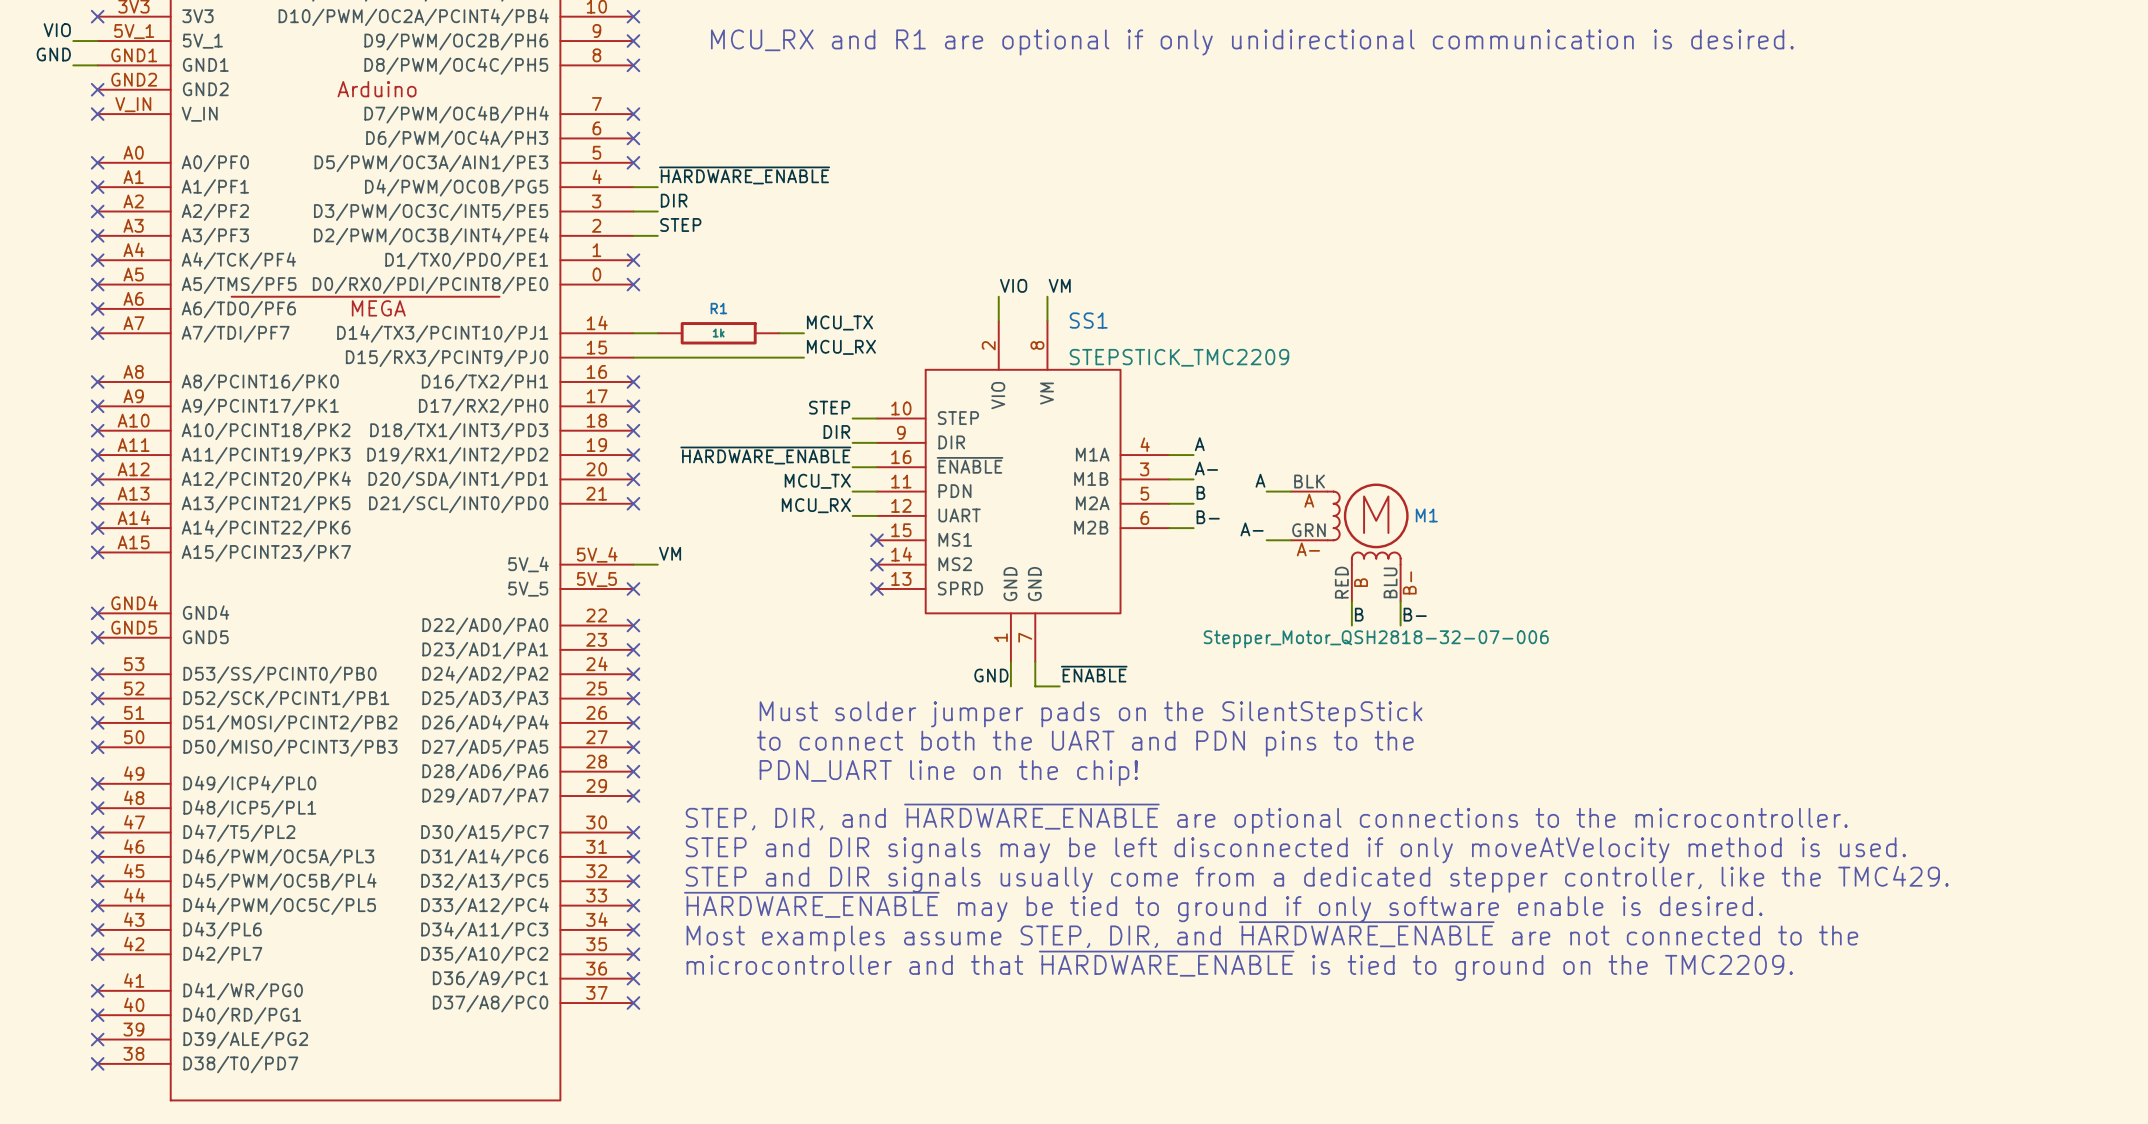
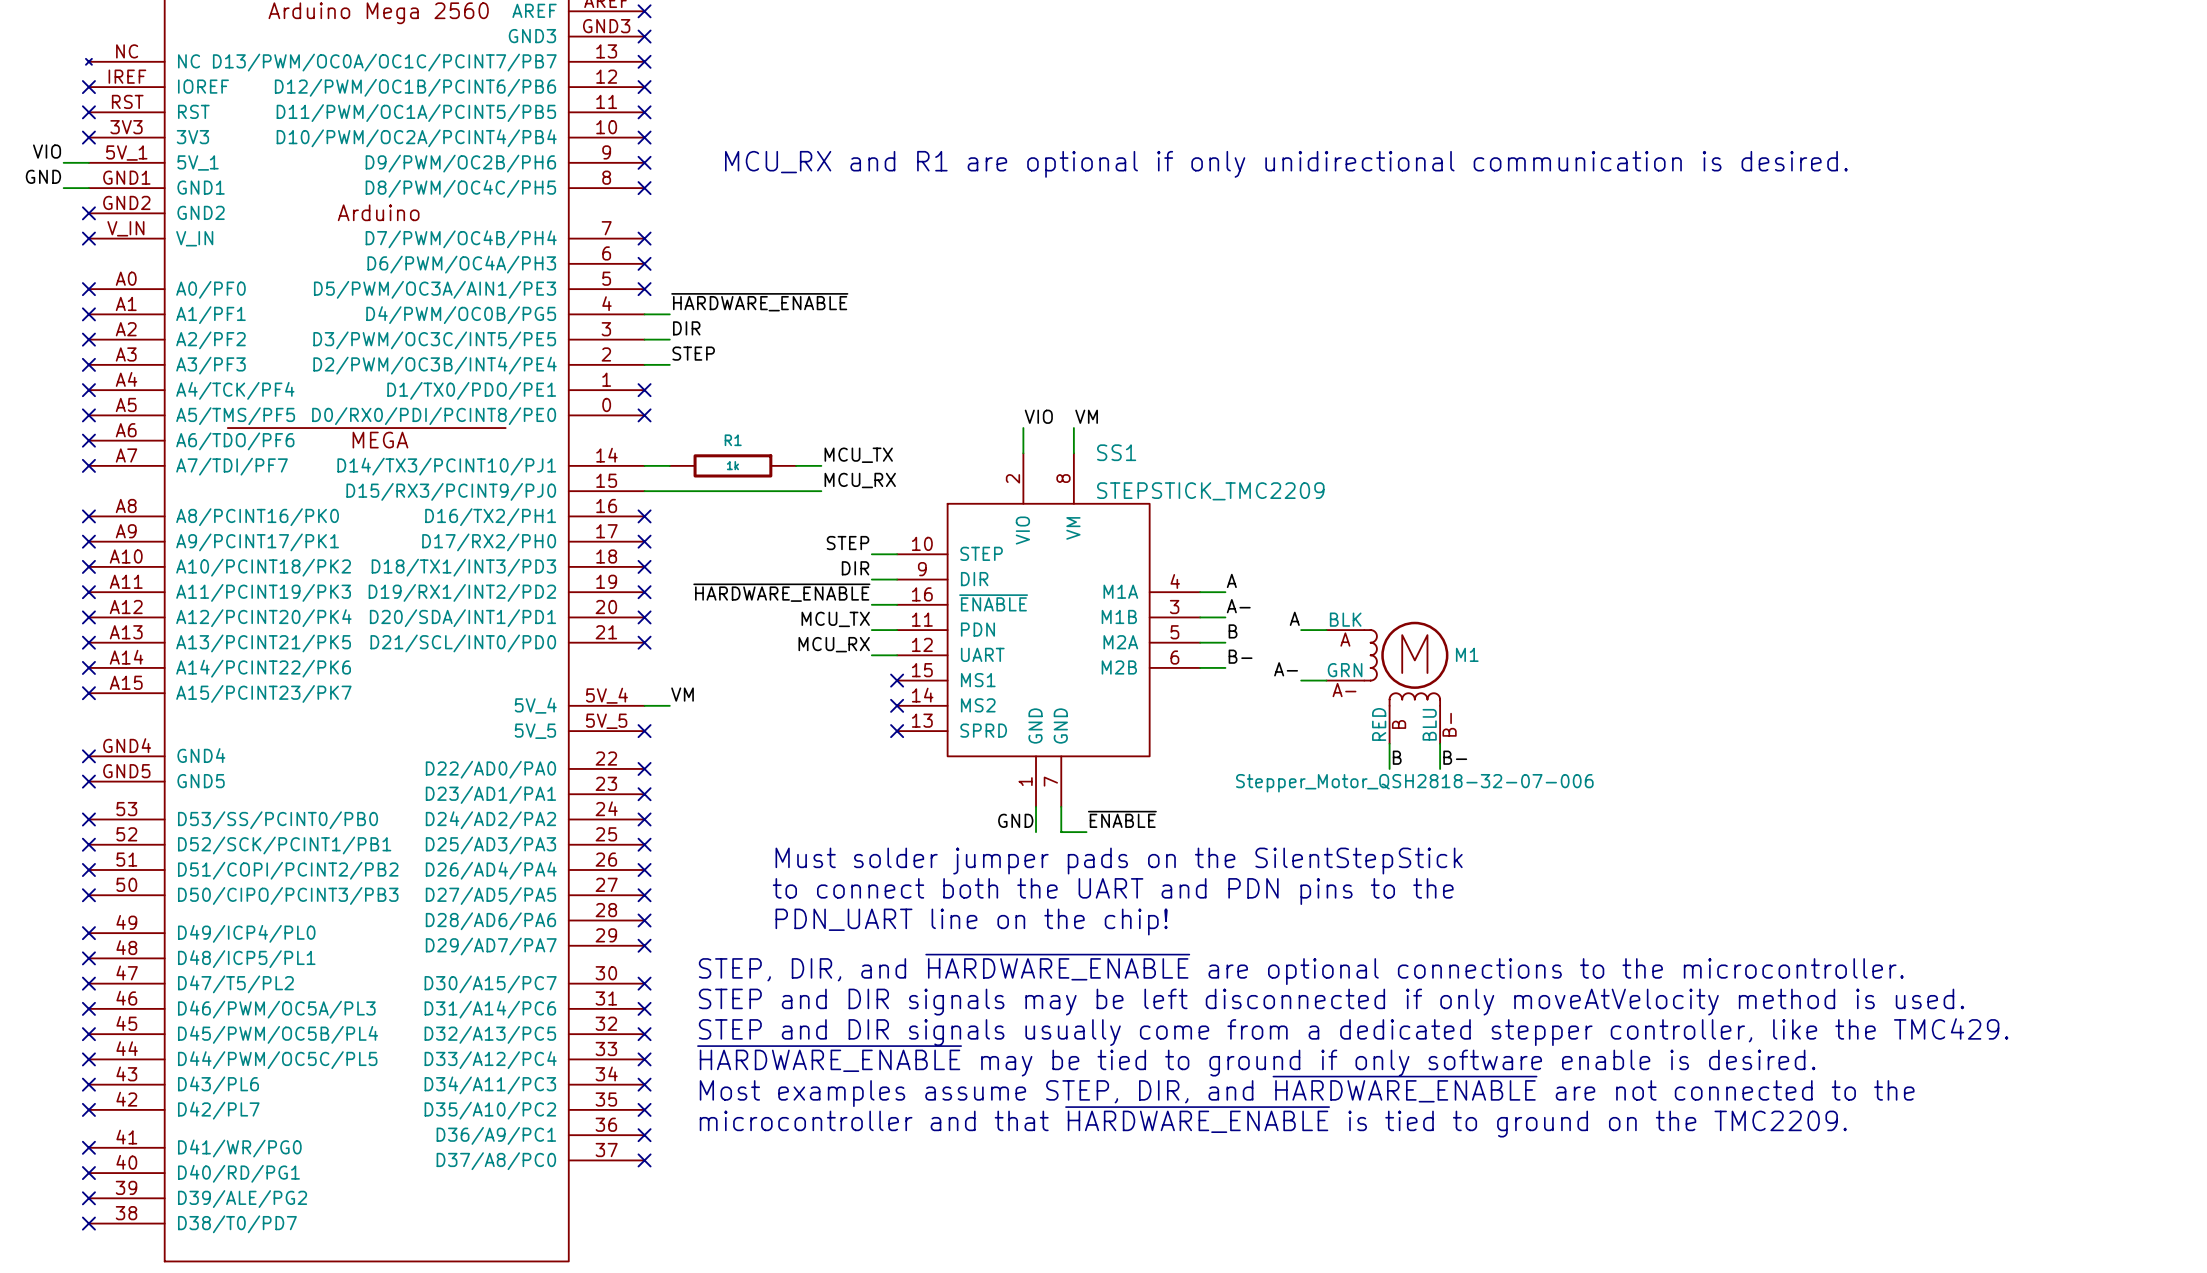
part pin name: D51/MOSI/PCINT2/PB2 (290, 723) -> D51/COPI/PCINT2/PB2 (288, 870)
part pin name: D50/MISO/PCINT3/PB3 (290, 748) -> D50/CIPO/PCINT3/PB3 (288, 895)

